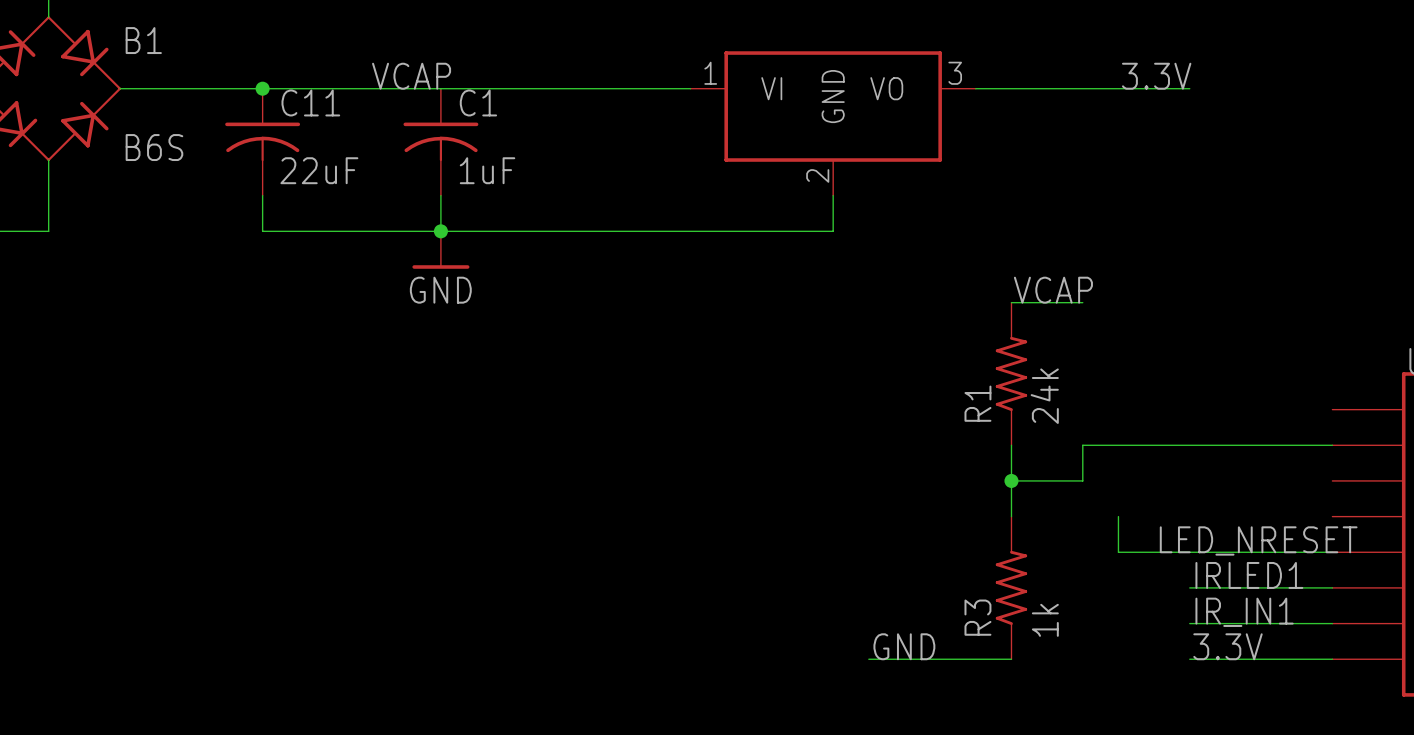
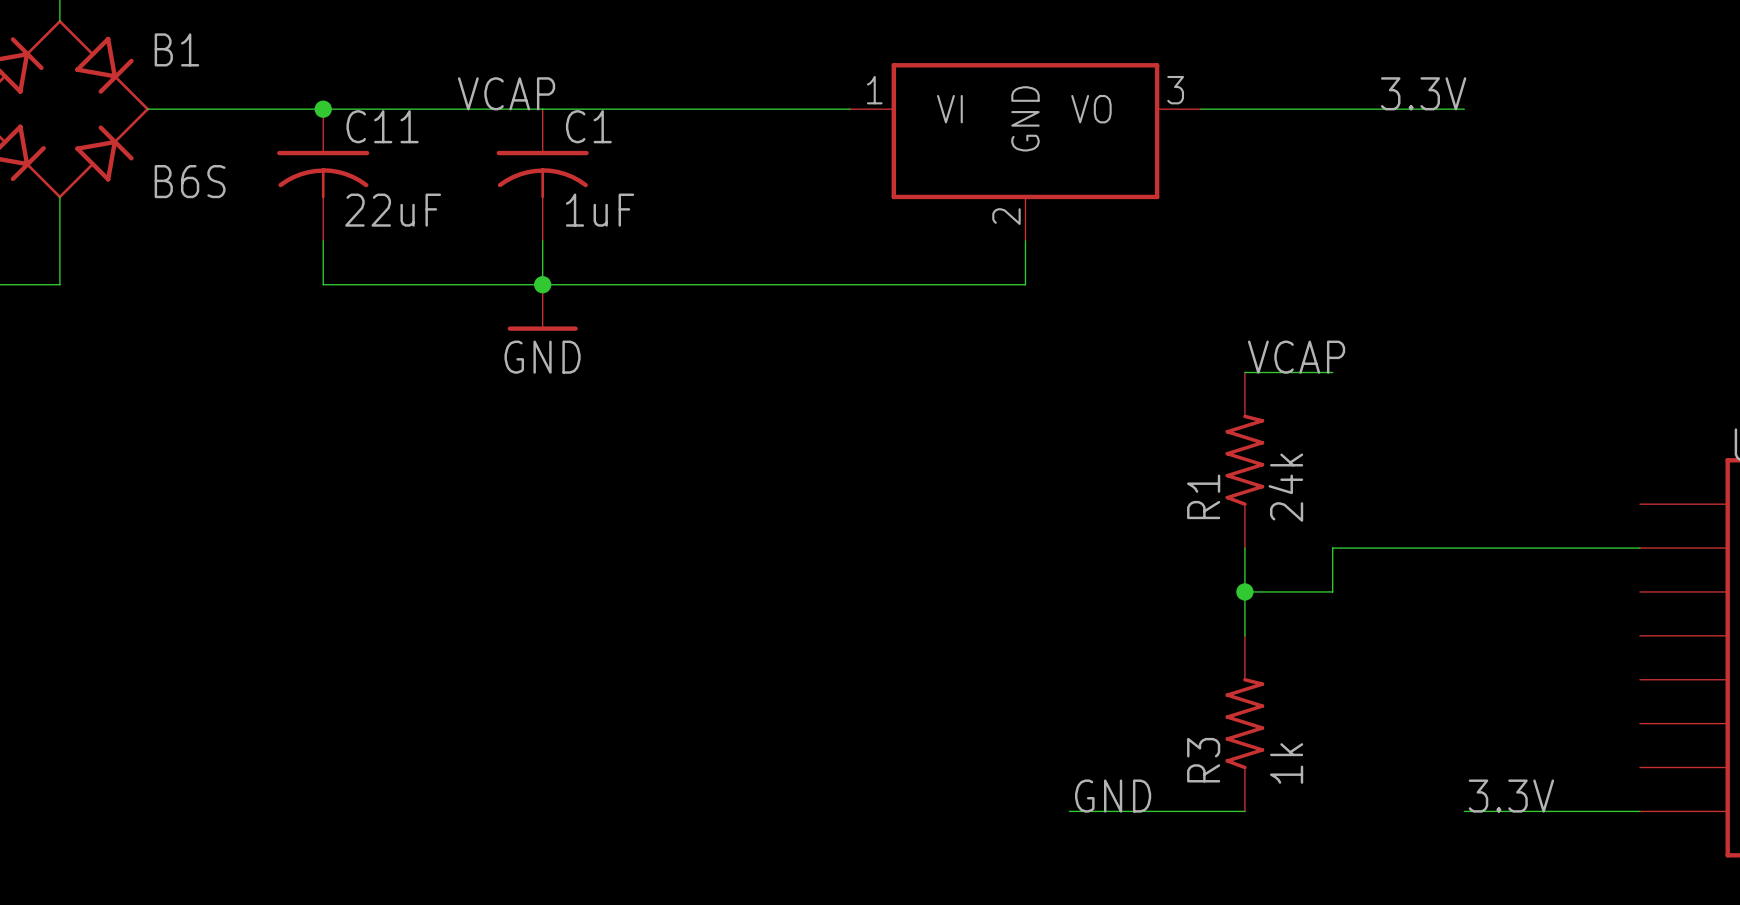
wire: (1118, 516) (1118, 552) (1332, 552) -> none
label: LED_NRESET (1258, 540) -> none
label: IRLED1 (1249, 575) -> none
wire: (1189, 587) (1332, 587) -> none
label: IR_IN1 (1244, 612) -> none
wire: (1189, 623) (1332, 623) -> none

